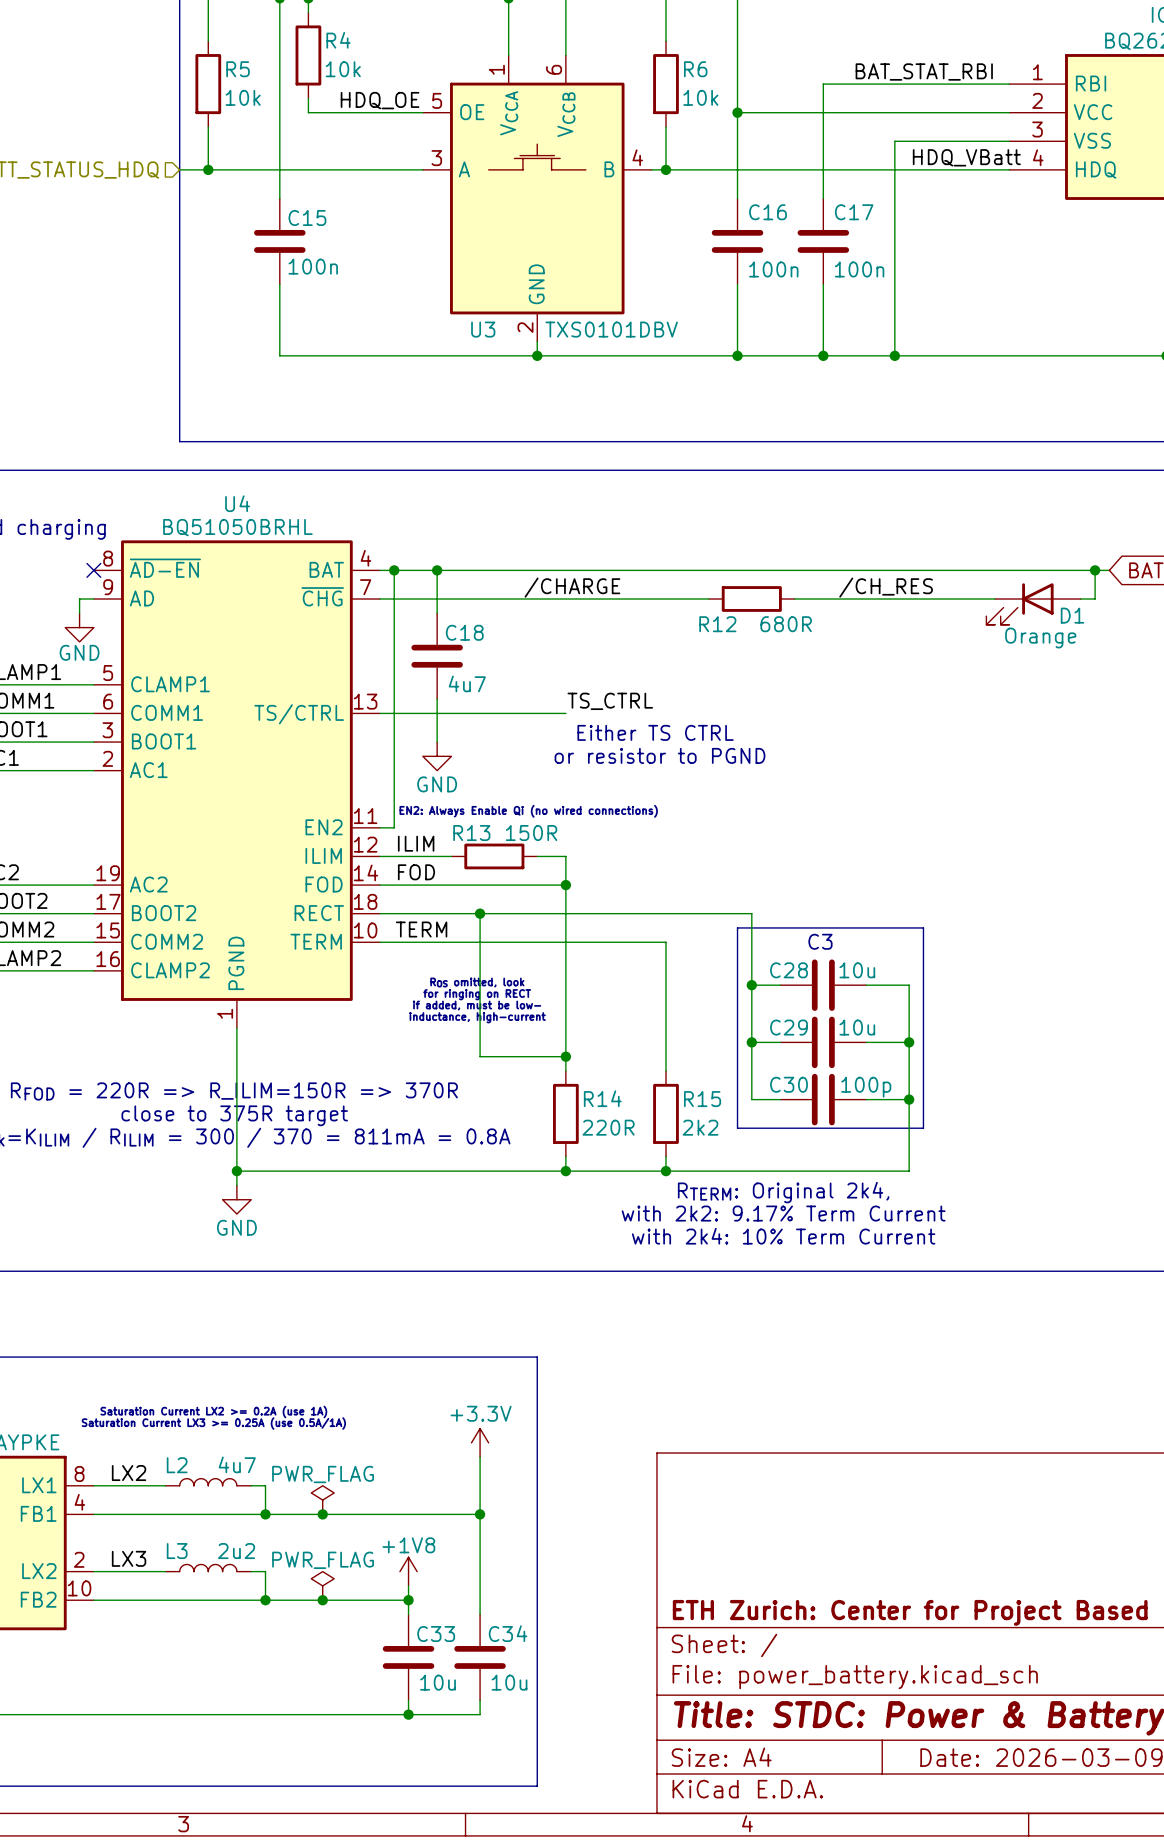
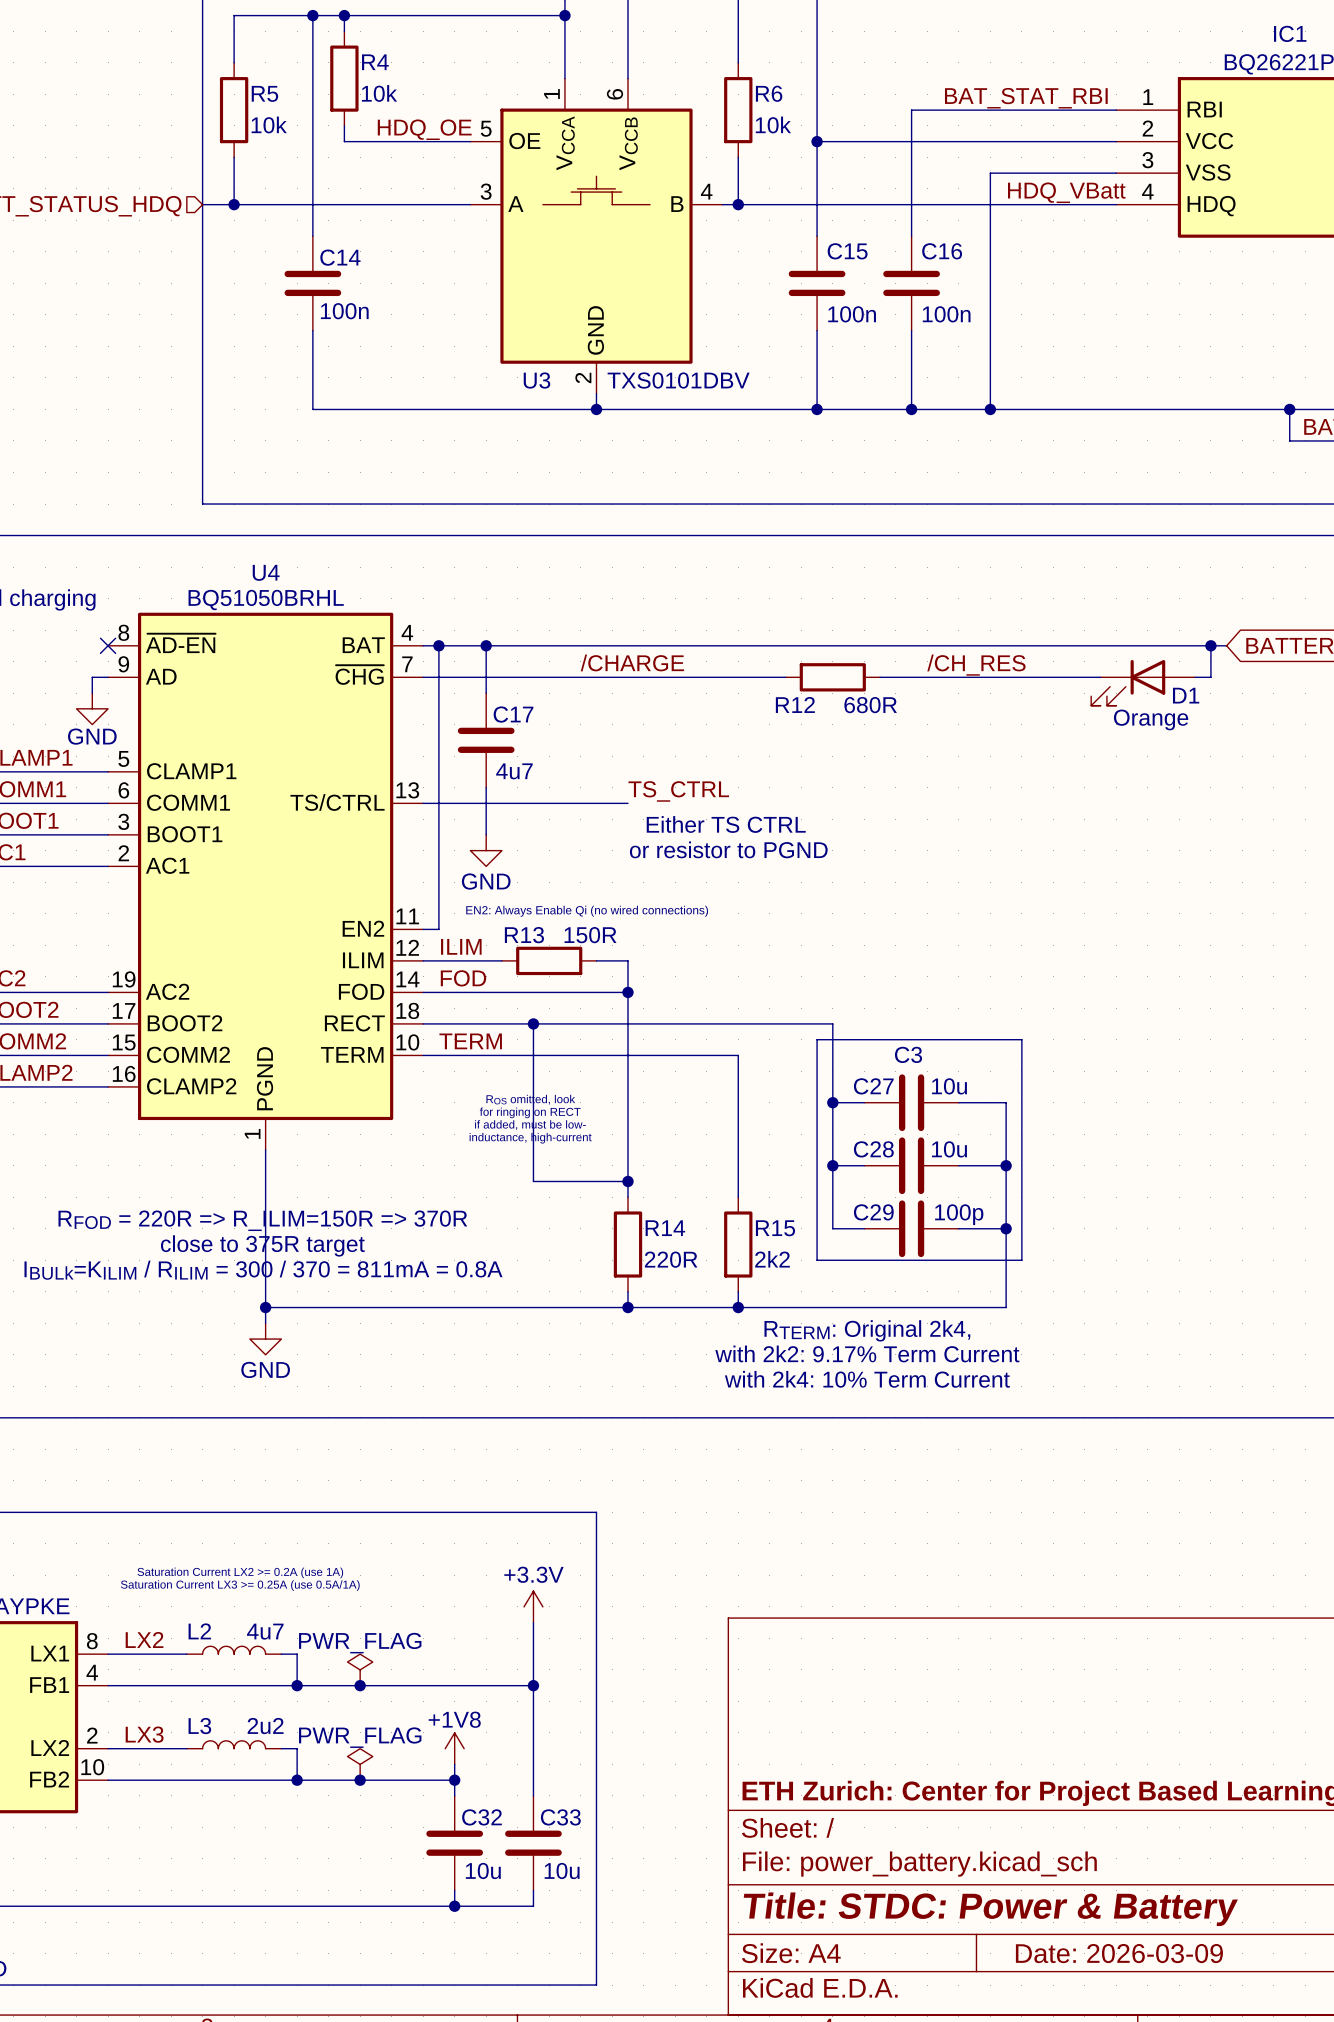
C16 name: C16 (767, 212) -> C15 (847, 251)
C17 name: C17 (854, 212) -> C16 (942, 251)
C15 name: C15 (307, 218) -> C14 (340, 257)
C18 name: C18 (464, 632) -> C17 (513, 714)
C28 name: C28 (789, 970) -> C27 (873, 1086)
C29 name: C29 (789, 1027) -> C28 (873, 1149)
C30 name: C30 (789, 1084) -> C29 (873, 1212)
C34 name: C34 (508, 1633) -> C33 (560, 1817)
C33 name: C33 (436, 1634) -> C32 (481, 1817)

